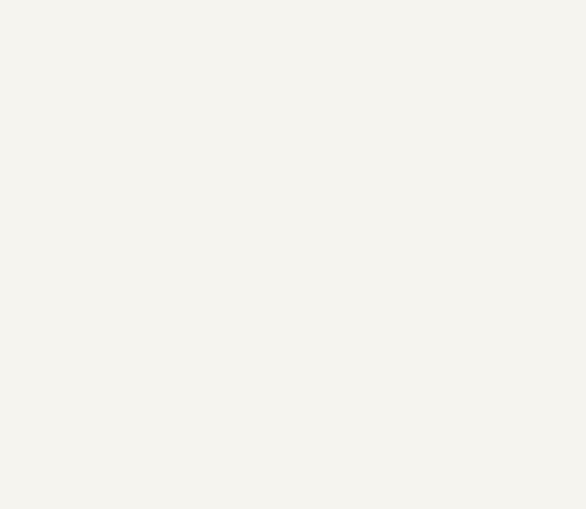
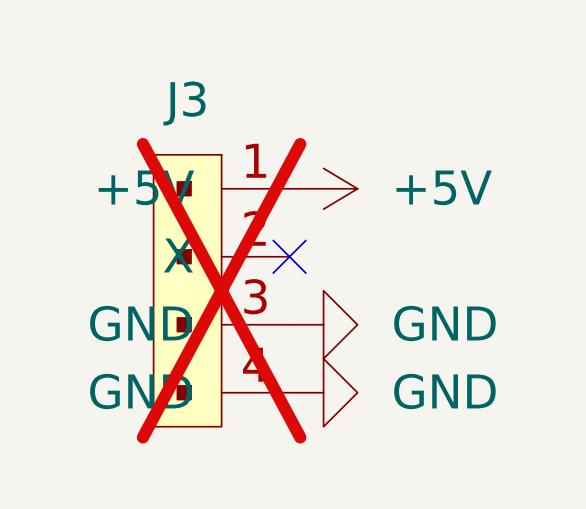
power symbol: none -> +5V (323, 188)
no-connect mark: none -> (289, 256)
J3: none -> (221, 290)
power symbol: none -> GND (323, 324)
power symbol: none -> GND (323, 392)

